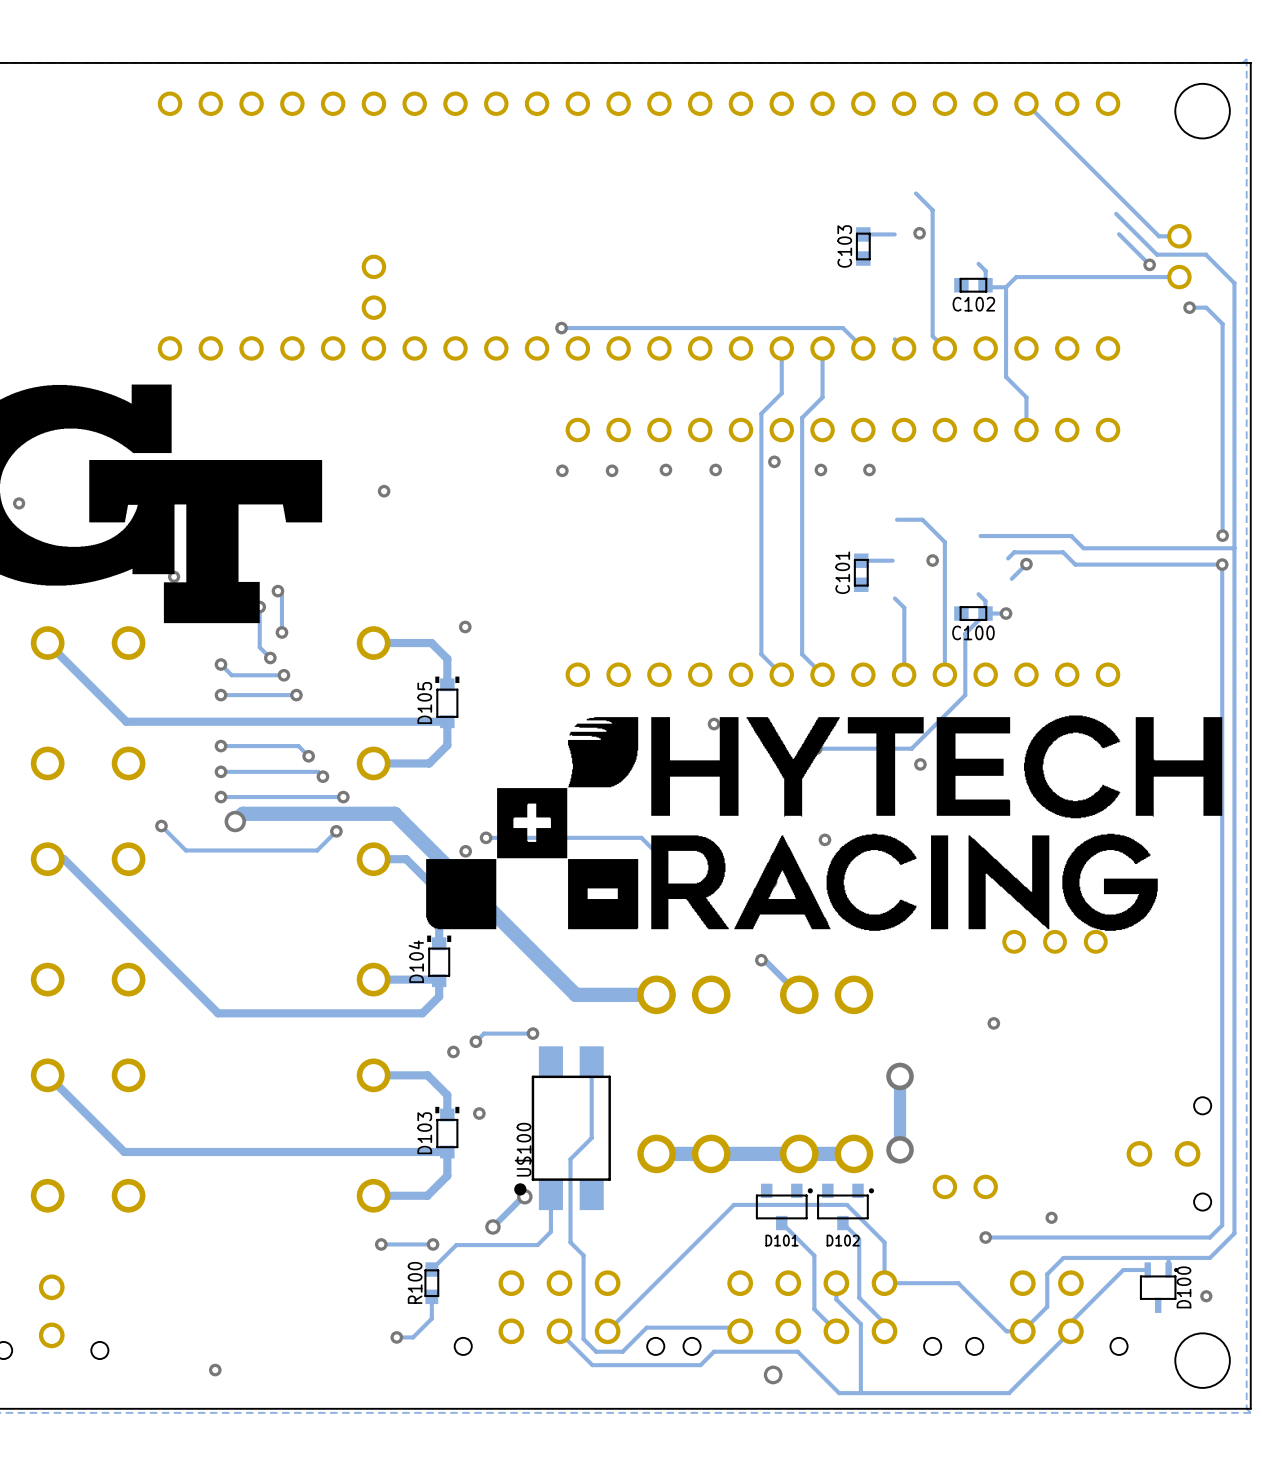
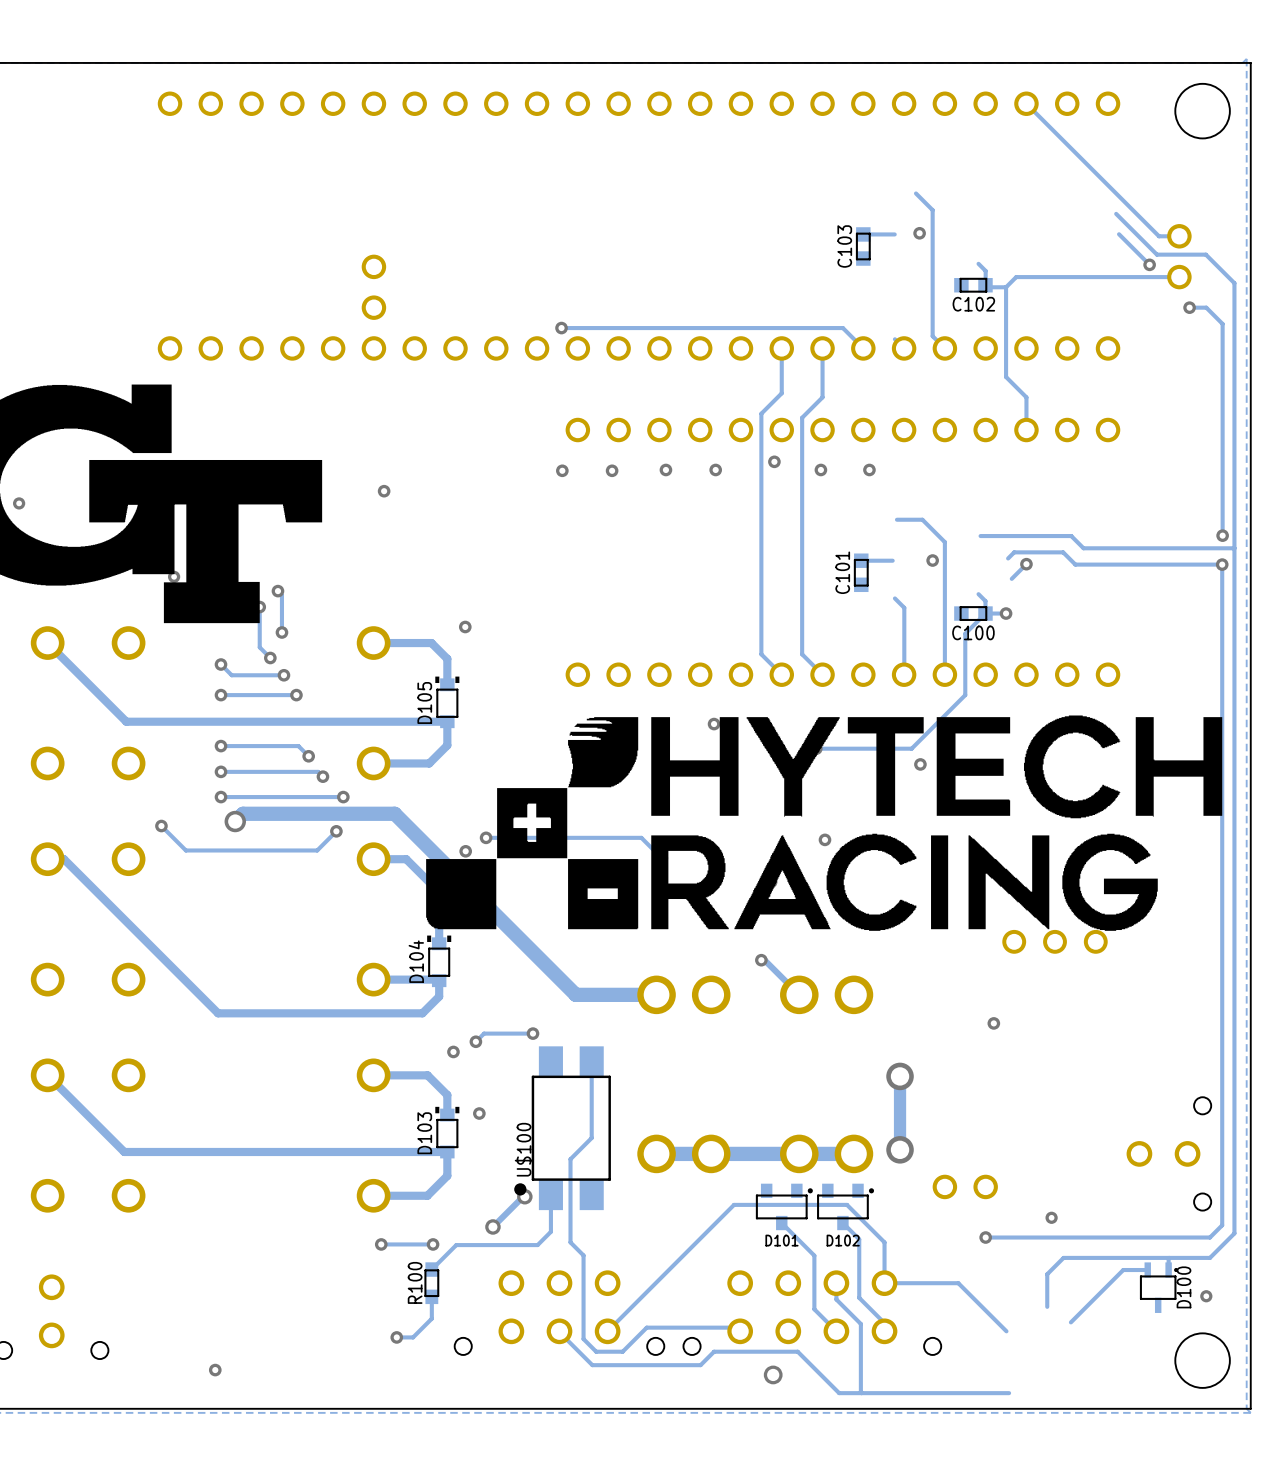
track: (1047, 1306) (1022, 1331) (1006, 1331) -> none
part: (1046, 1312) -> none
track: (1070, 1322) (1070, 1331) (1009, 1393) -> none

